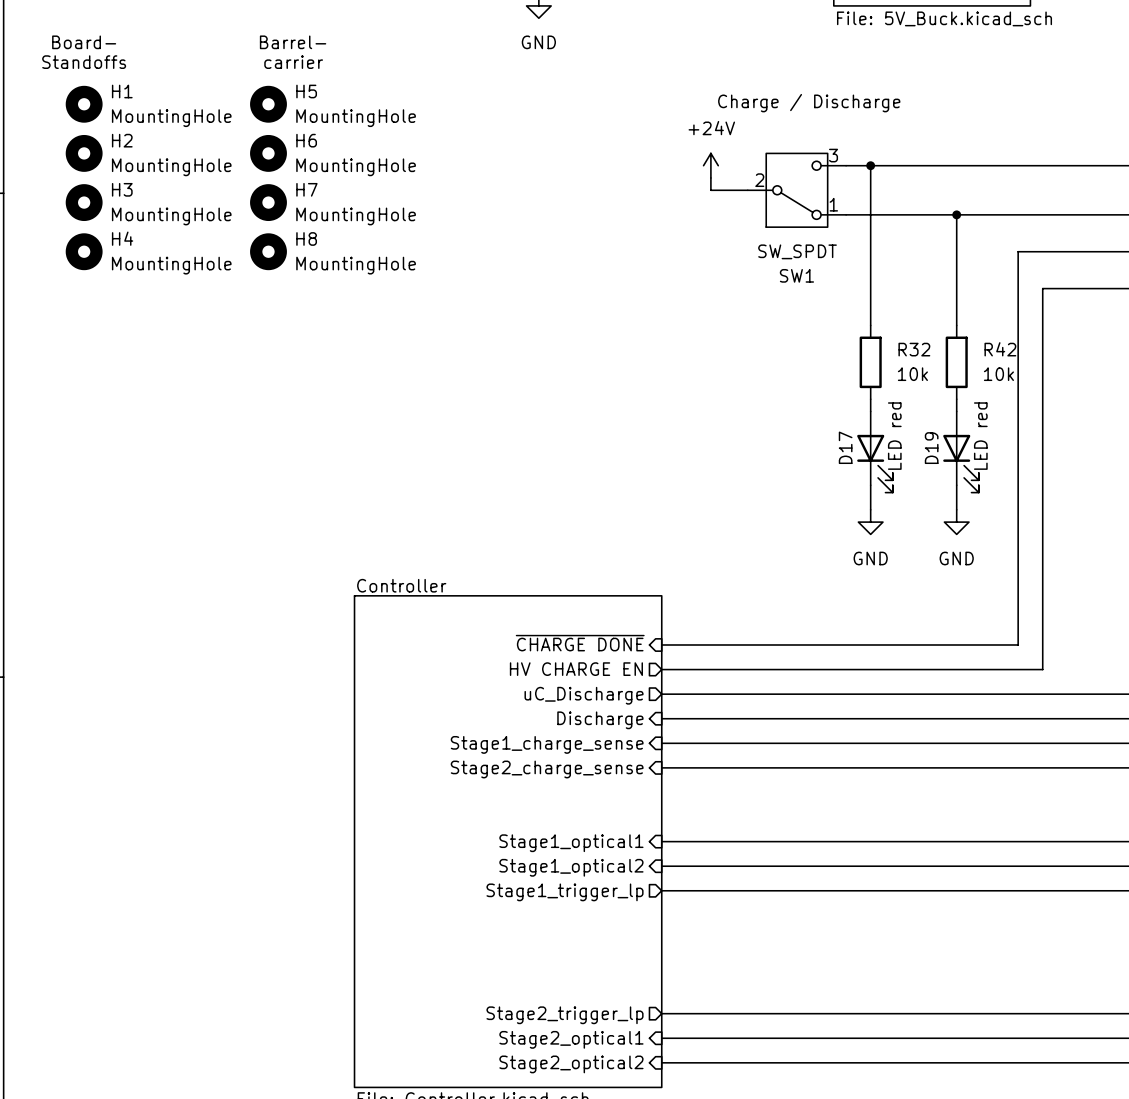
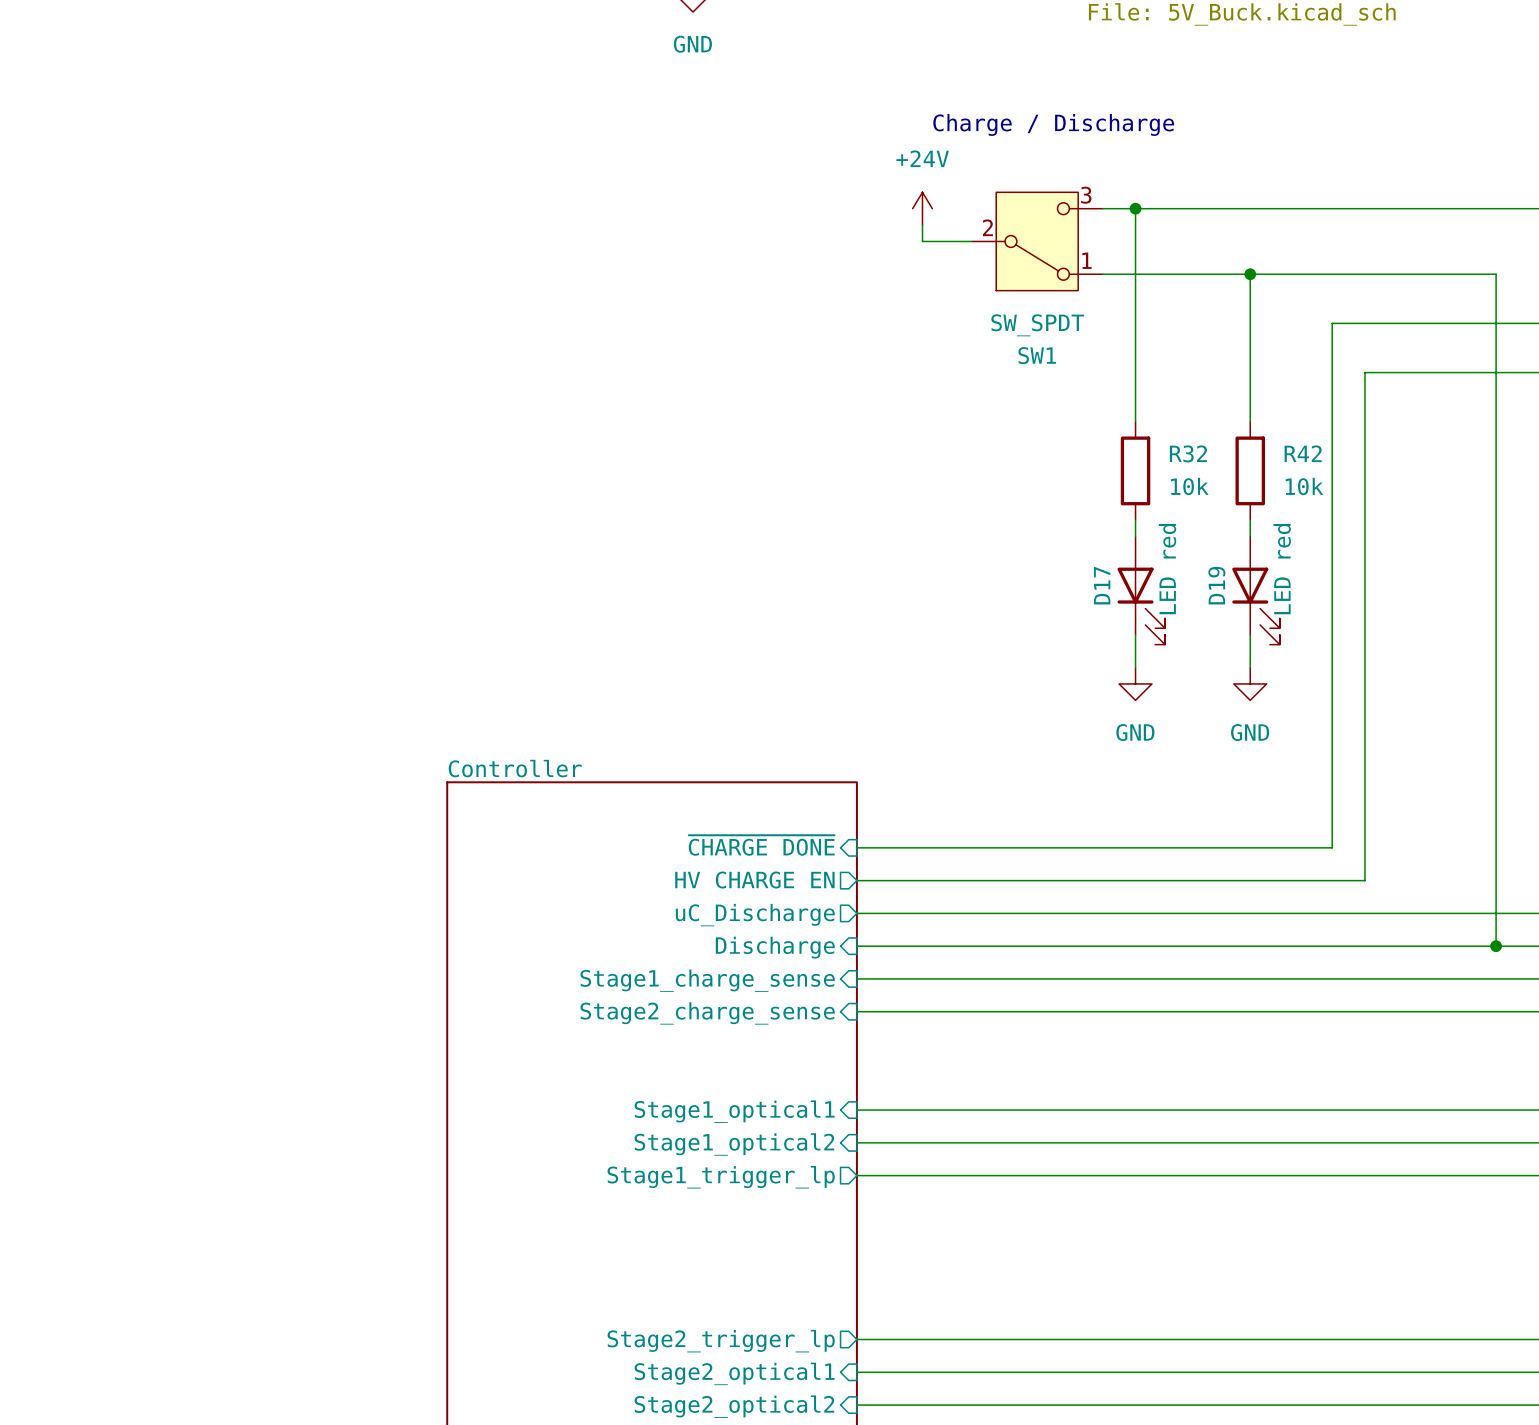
text: Board- (84, 42) -> none
text: Barrel- (293, 42) -> none
text: Standoffs (84, 62) -> none
text: carrier (293, 62) -> none
H1: MountingHole (84, 104) -> none
H5: MountingHole (268, 104) -> none
H2: MountingHole (84, 153) -> none
H6: MountingHole (268, 153) -> none
H3: MountingHole (84, 202) -> none
H7: MountingHole (268, 202) -> none
H4: MountingHole (84, 251) -> none
H8: MountingHole (268, 251) -> none

